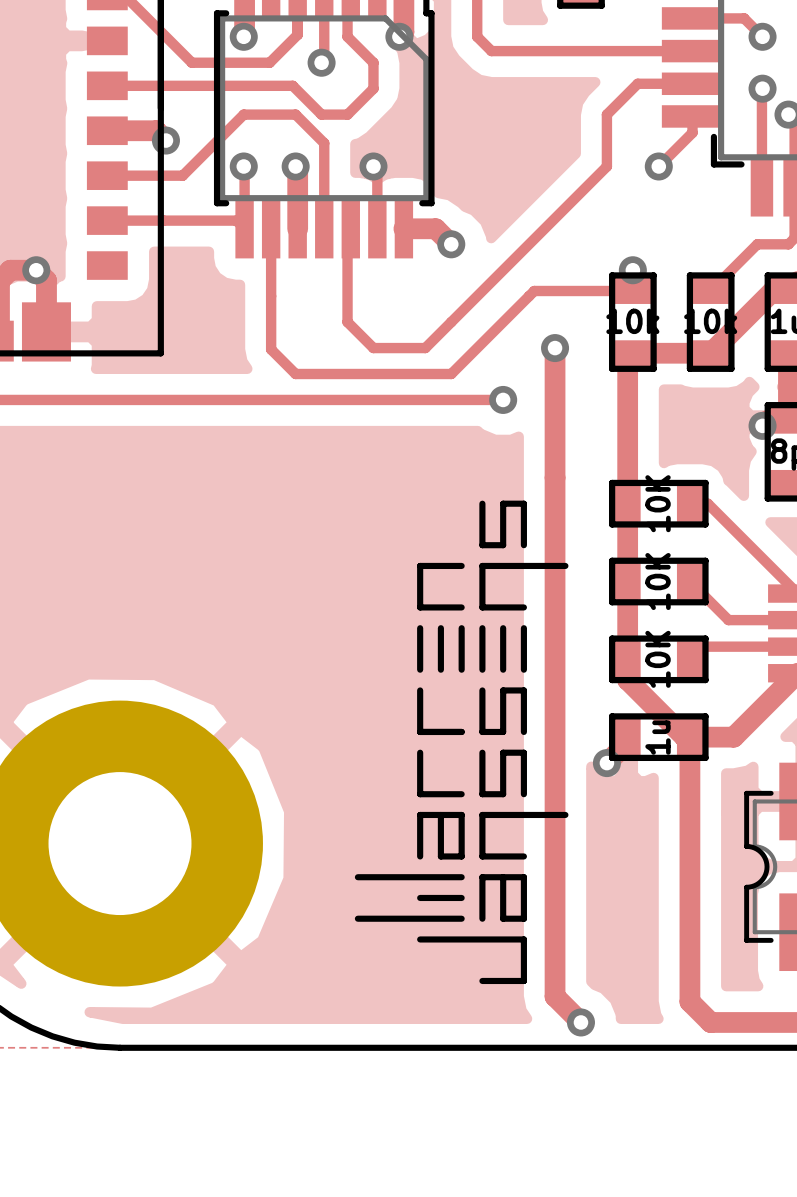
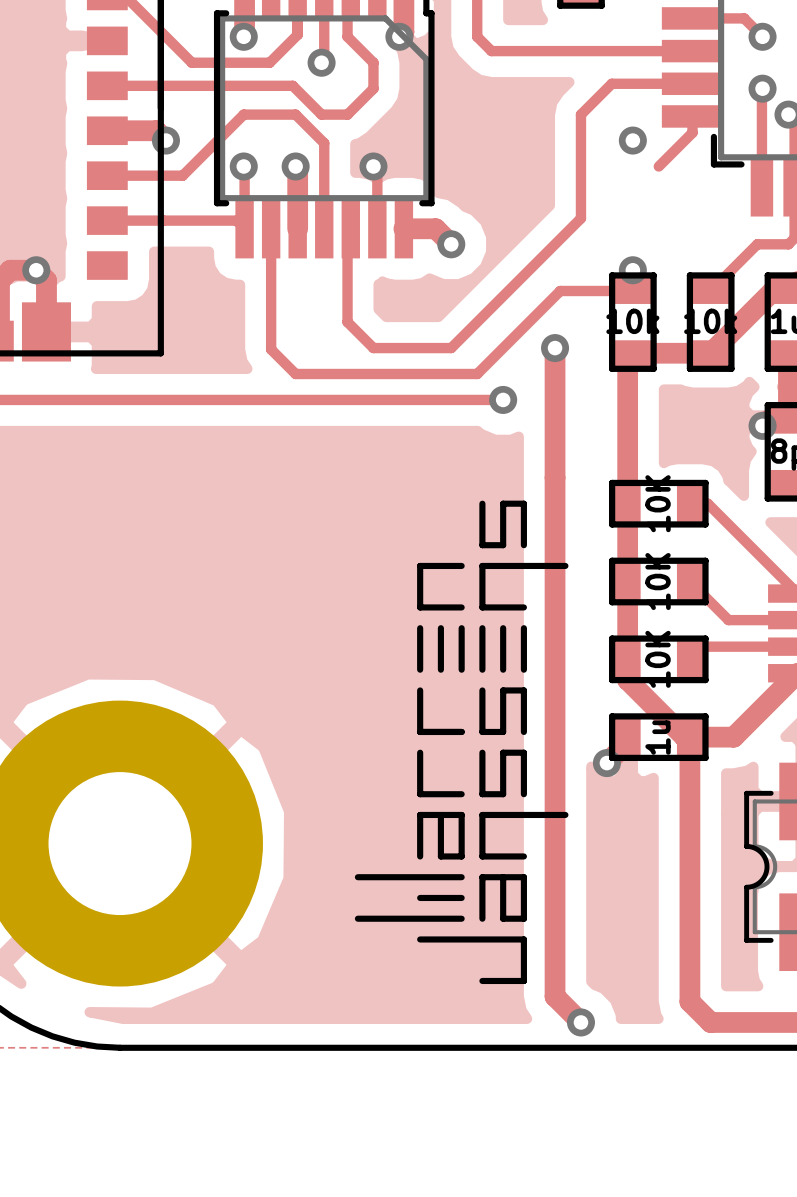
track: (637, 83) (606, 114) (606, 166) (425, 348) -> (637, 83) (611, 83) (580, 114) (580, 218) (451, 348) (425, 348)
via position: (658, 166) -> (632, 140)
track: (560, 291) (534, 291) (451, 374) -> (560, 291) (477, 374) (451, 374)

